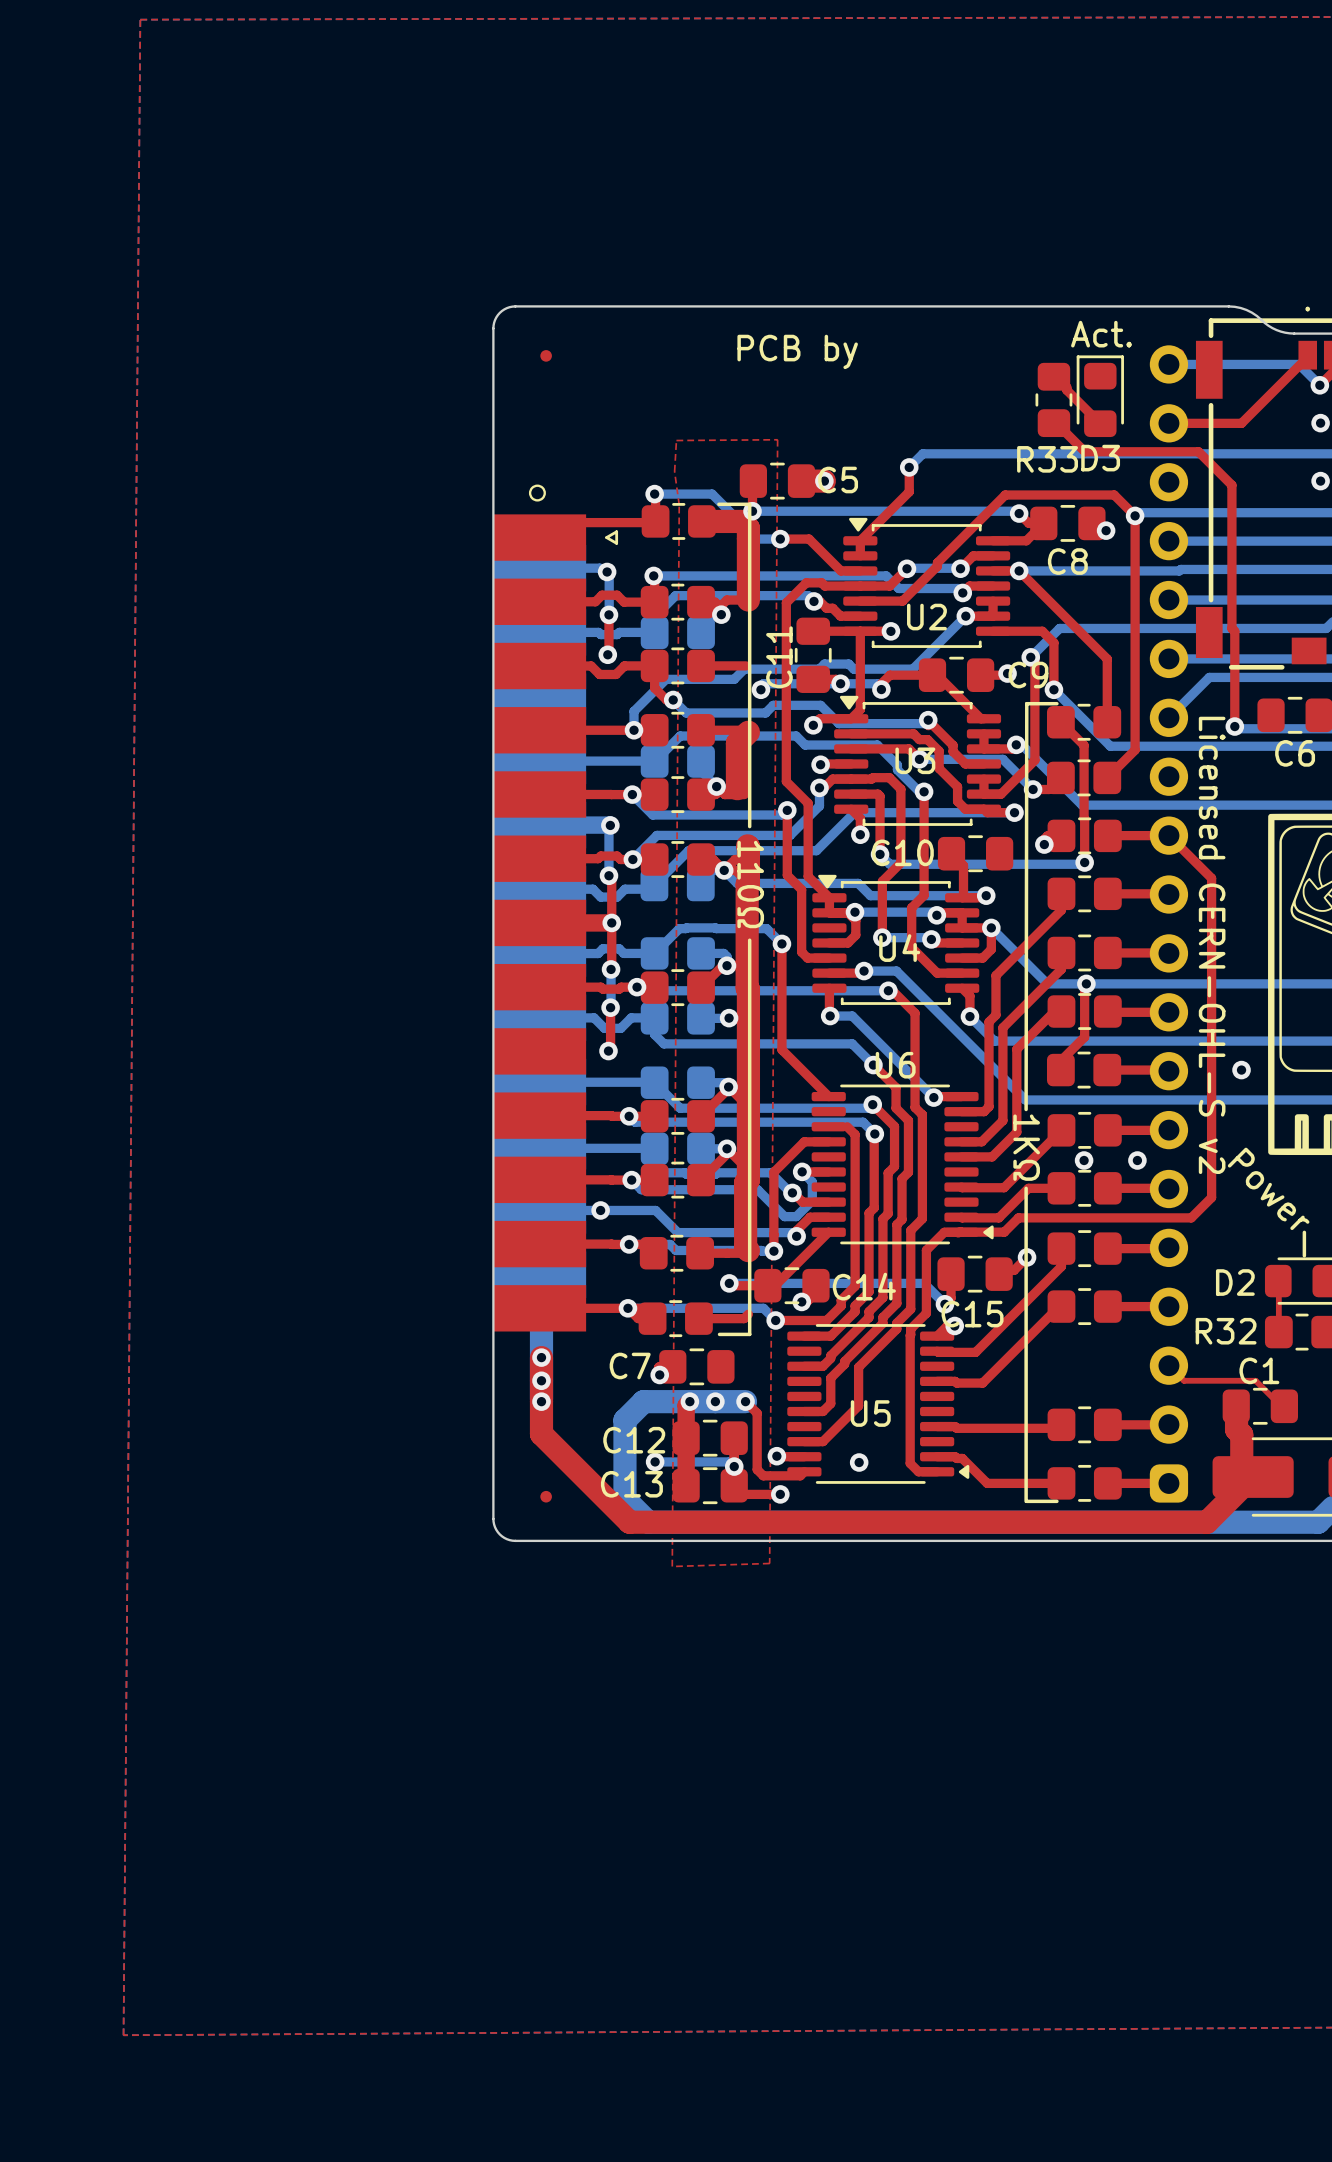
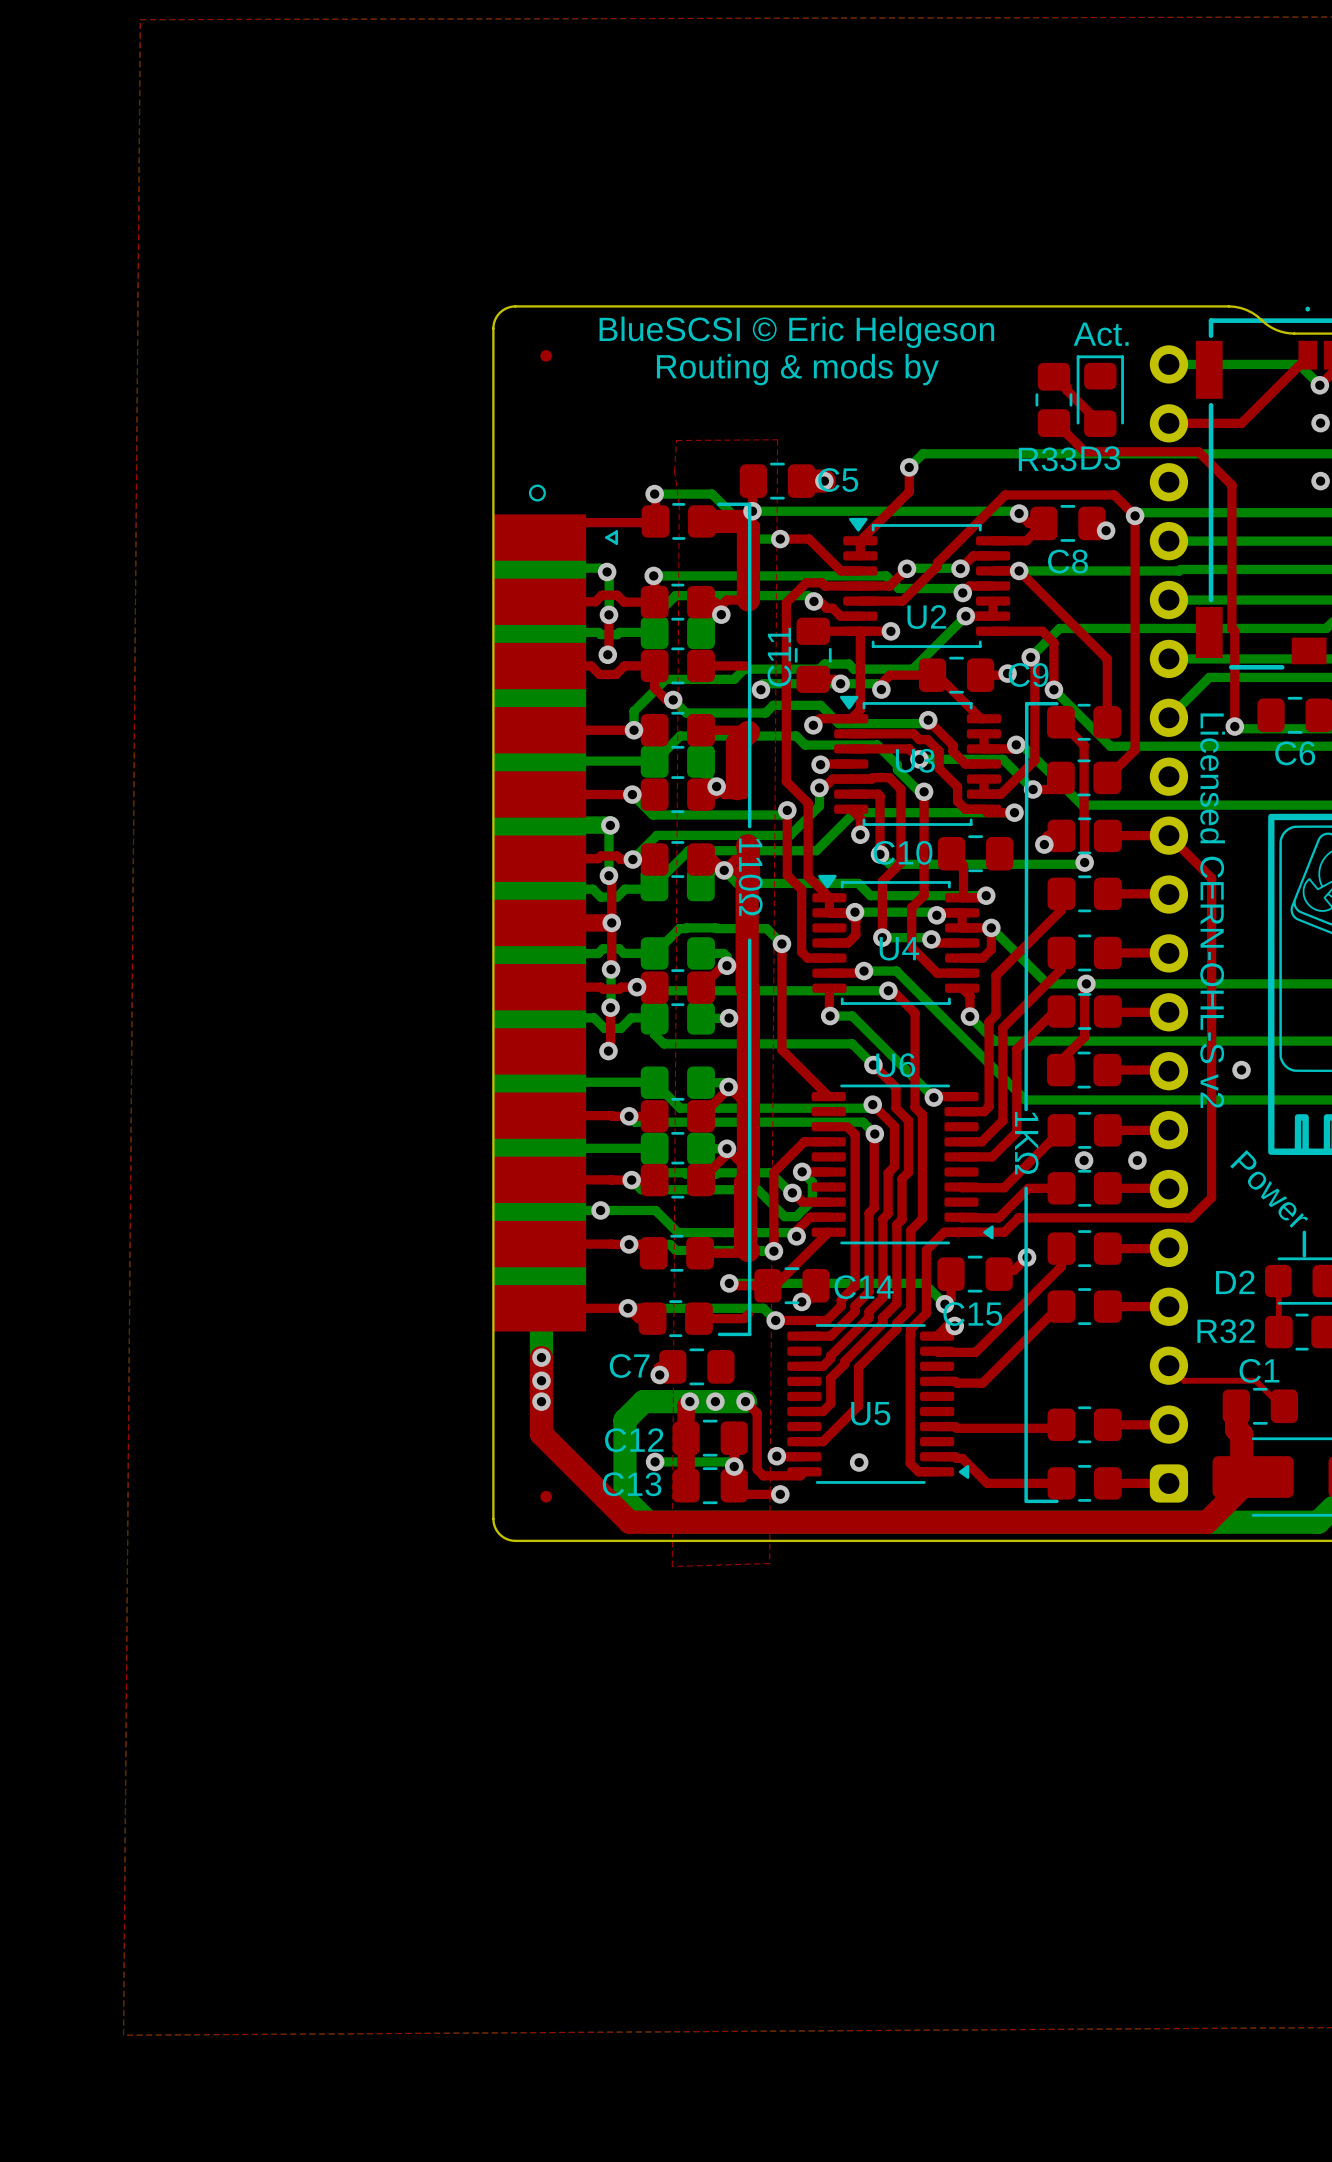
text: none -> BlueSCSI © Eric Helgeson (796, 332)
text: PCB by (797, 351) -> none
text: none -> Routing & mods by (797, 369)

